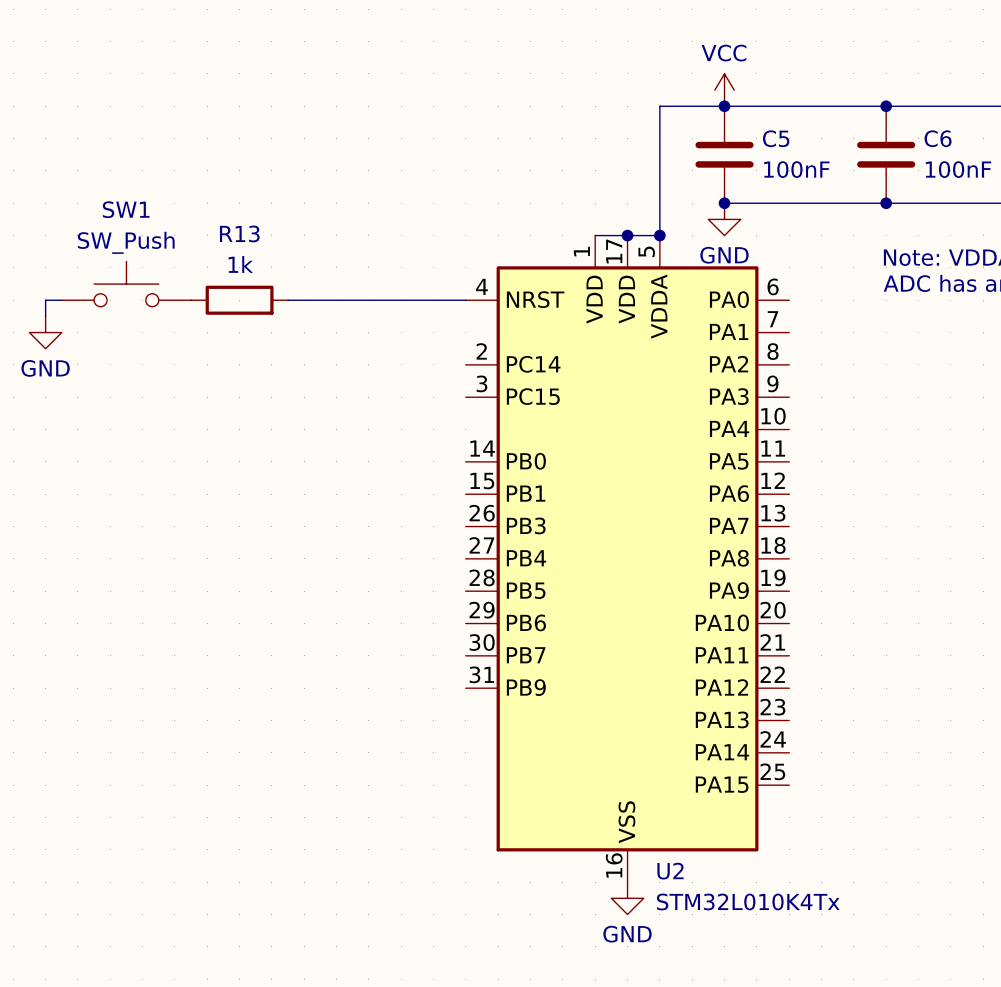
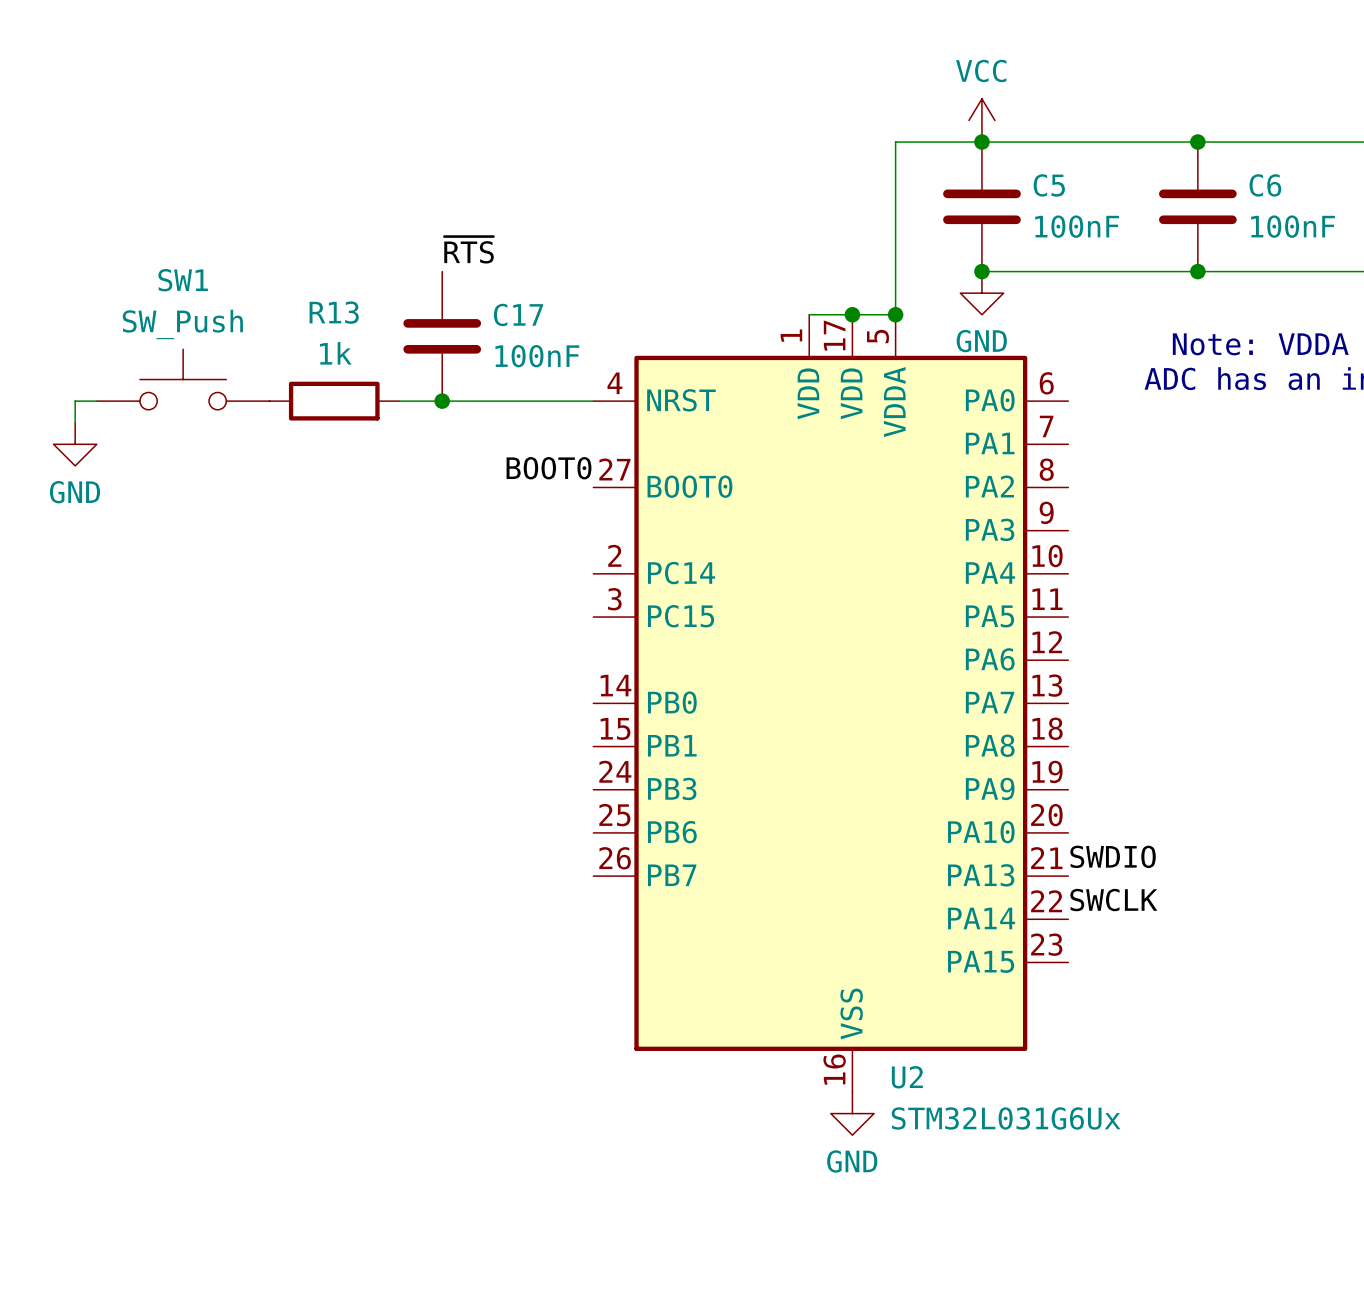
label: none -> ~{RTS} (469, 250)
U2 symbol: [465, 235, 790, 883] -> [593, 314, 1069, 1093]
C17: none -> 100nF (442, 336)
junction: none -> (442, 401)
label: none -> BOOT0 (549, 468)
label: none -> SWDIO (1113, 856)
label: none -> SWCLK (1113, 900)
U2 name position: U2 (670, 871) -> U2 (907, 1077)
power symbol position: GND (627, 898) -> GND (852, 1113)
U2 value: STM32L010K4Tx (748, 901) -> STM32L031G6Ux (1006, 1118)

